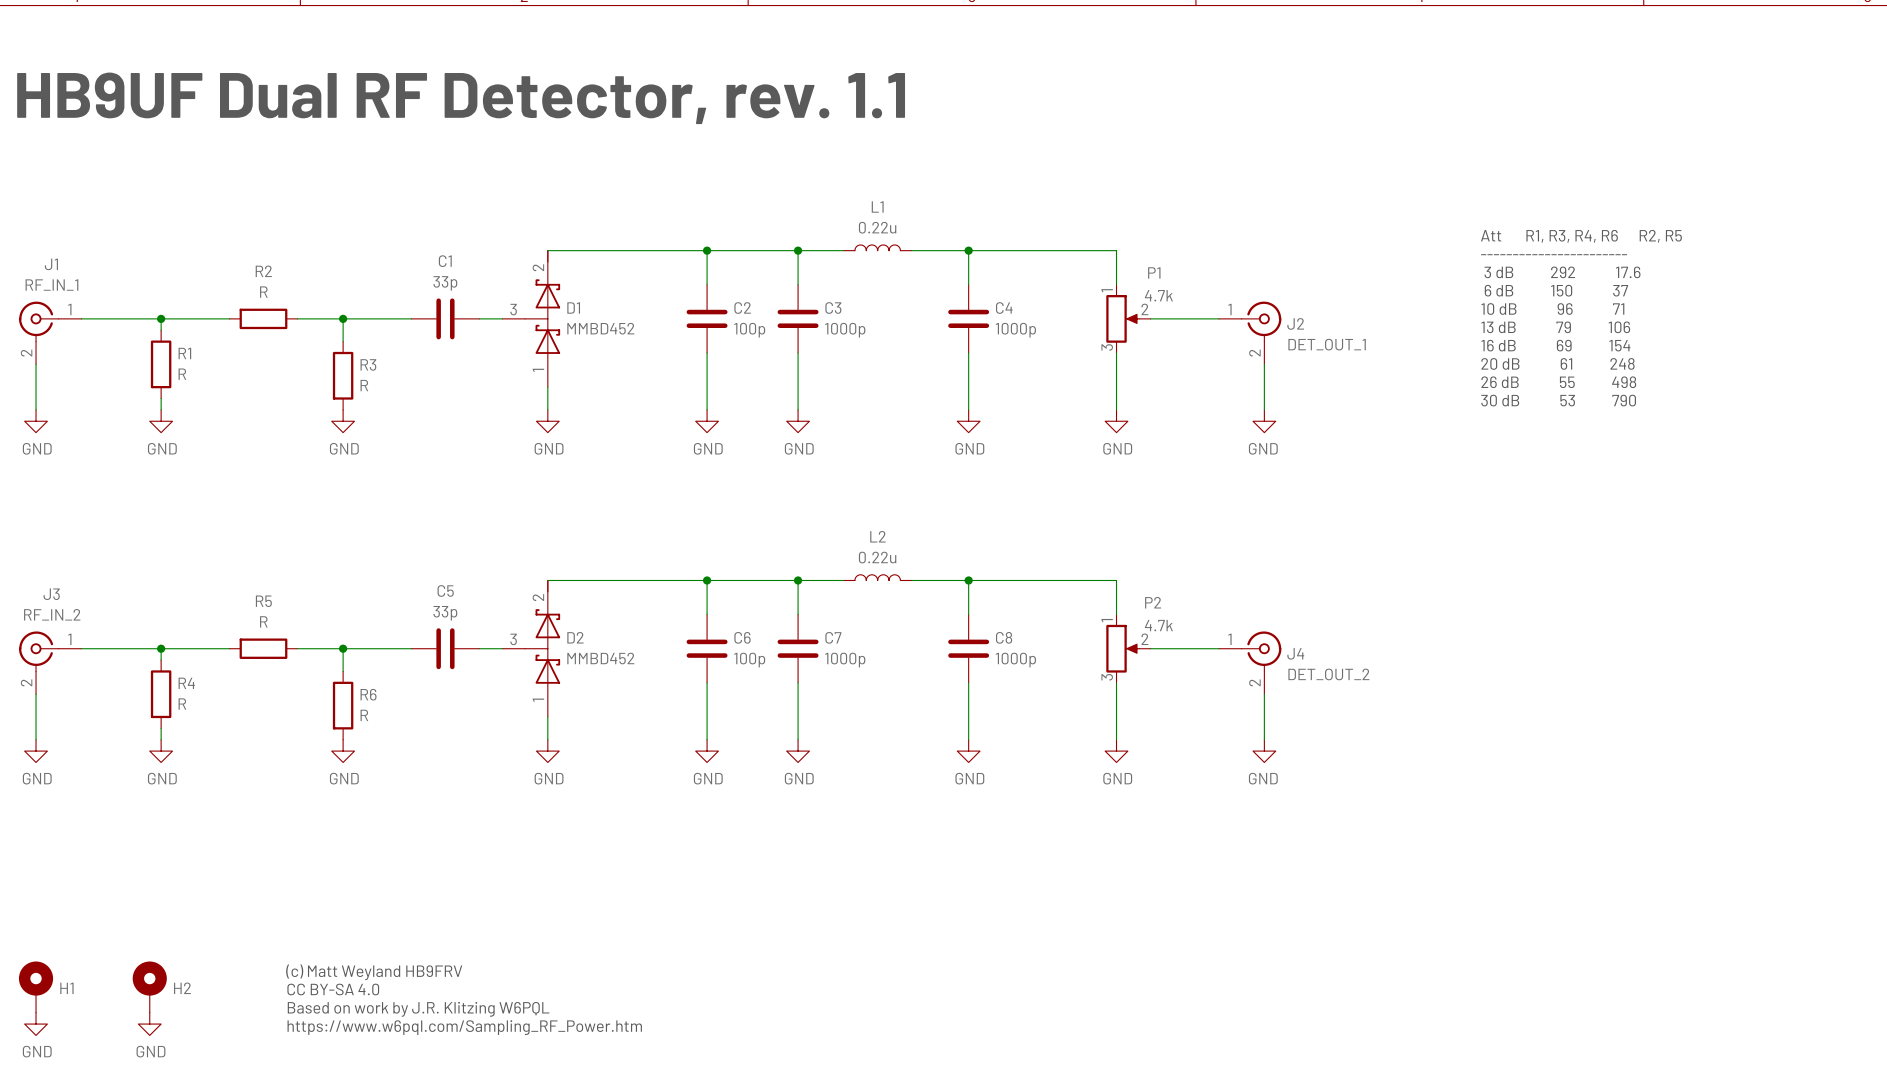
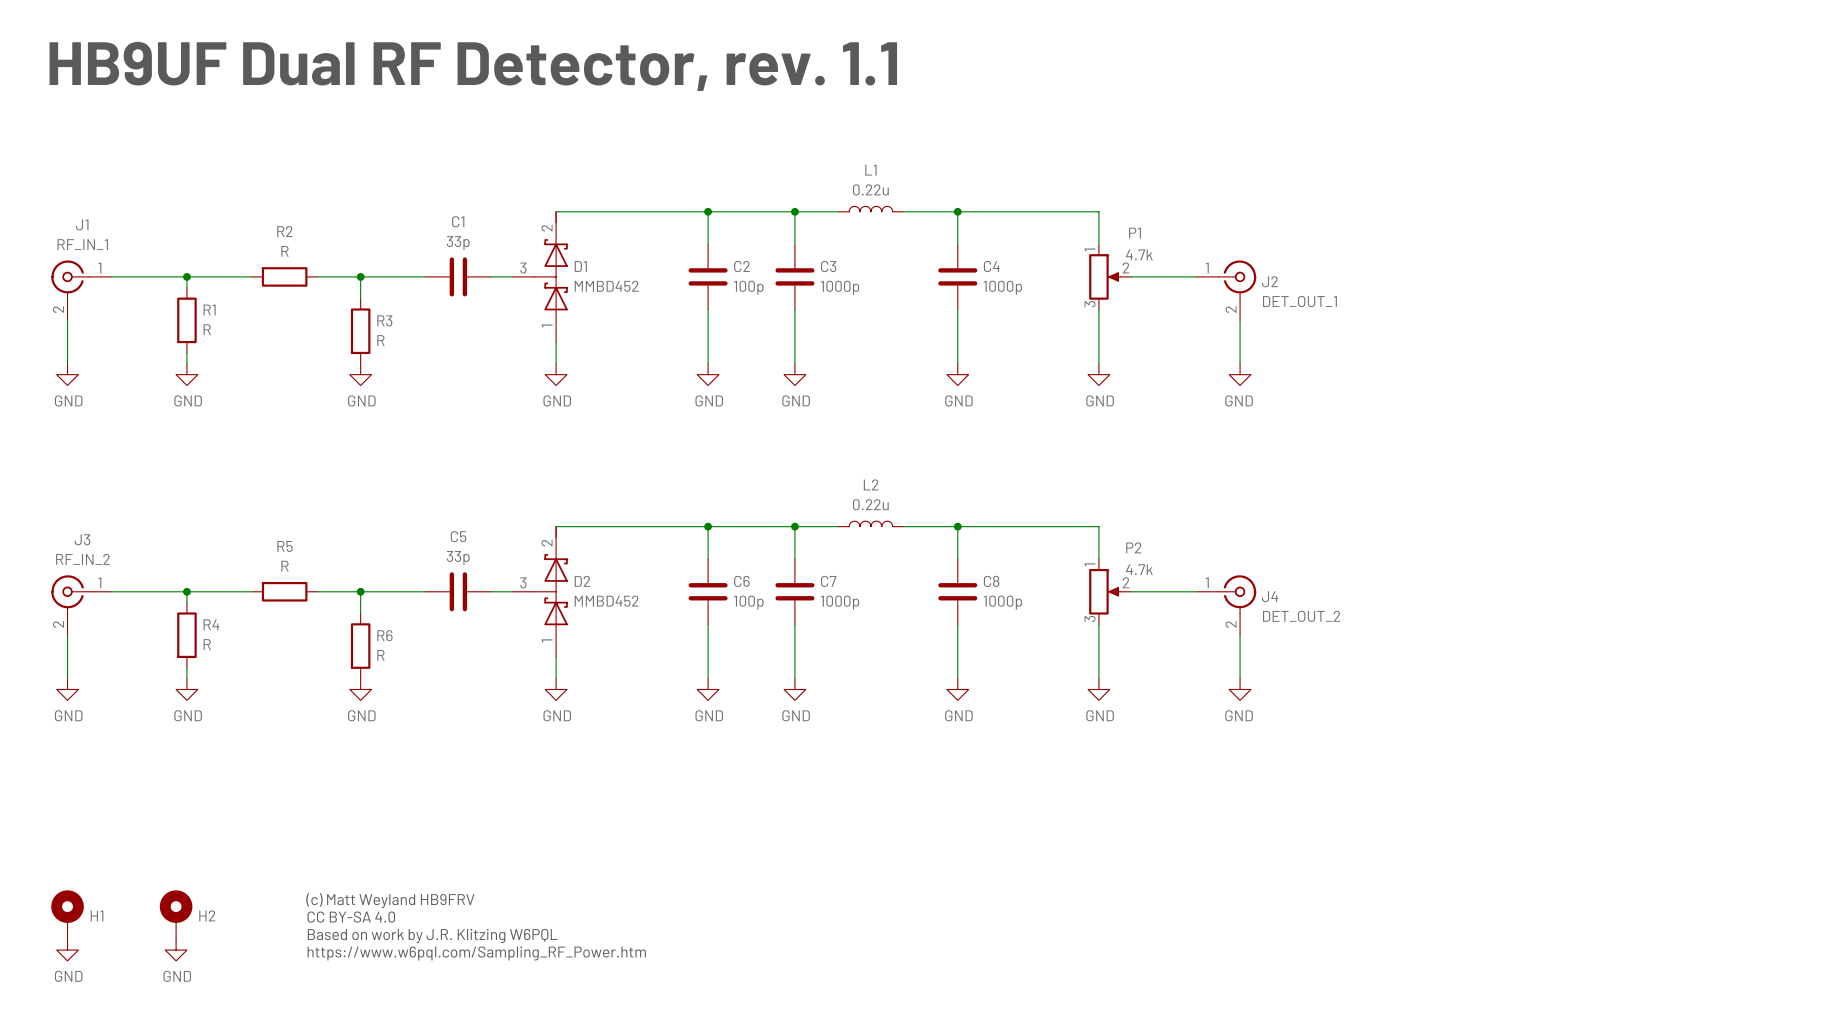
text: Att R1, R3, R4, R6 R2, R5 (1581, 236) -> none
text: ----------------------- (1554, 254) -> none
text: 3 dB 292 17.6 (1562, 272) -> none
text: 6 dB 150 37 (1556, 290) -> none
text: 10 dB 96 71 (1552, 309) -> none
text: 13 dB 79 106 (1555, 327) -> none
text: 16 dB 69 154 (1555, 345) -> none
text: 20 dB 61 248 (1557, 363) -> none
text: 26 dB 55 498 (1558, 382) -> none
text: 30 dB 53 790 (1558, 400) -> none

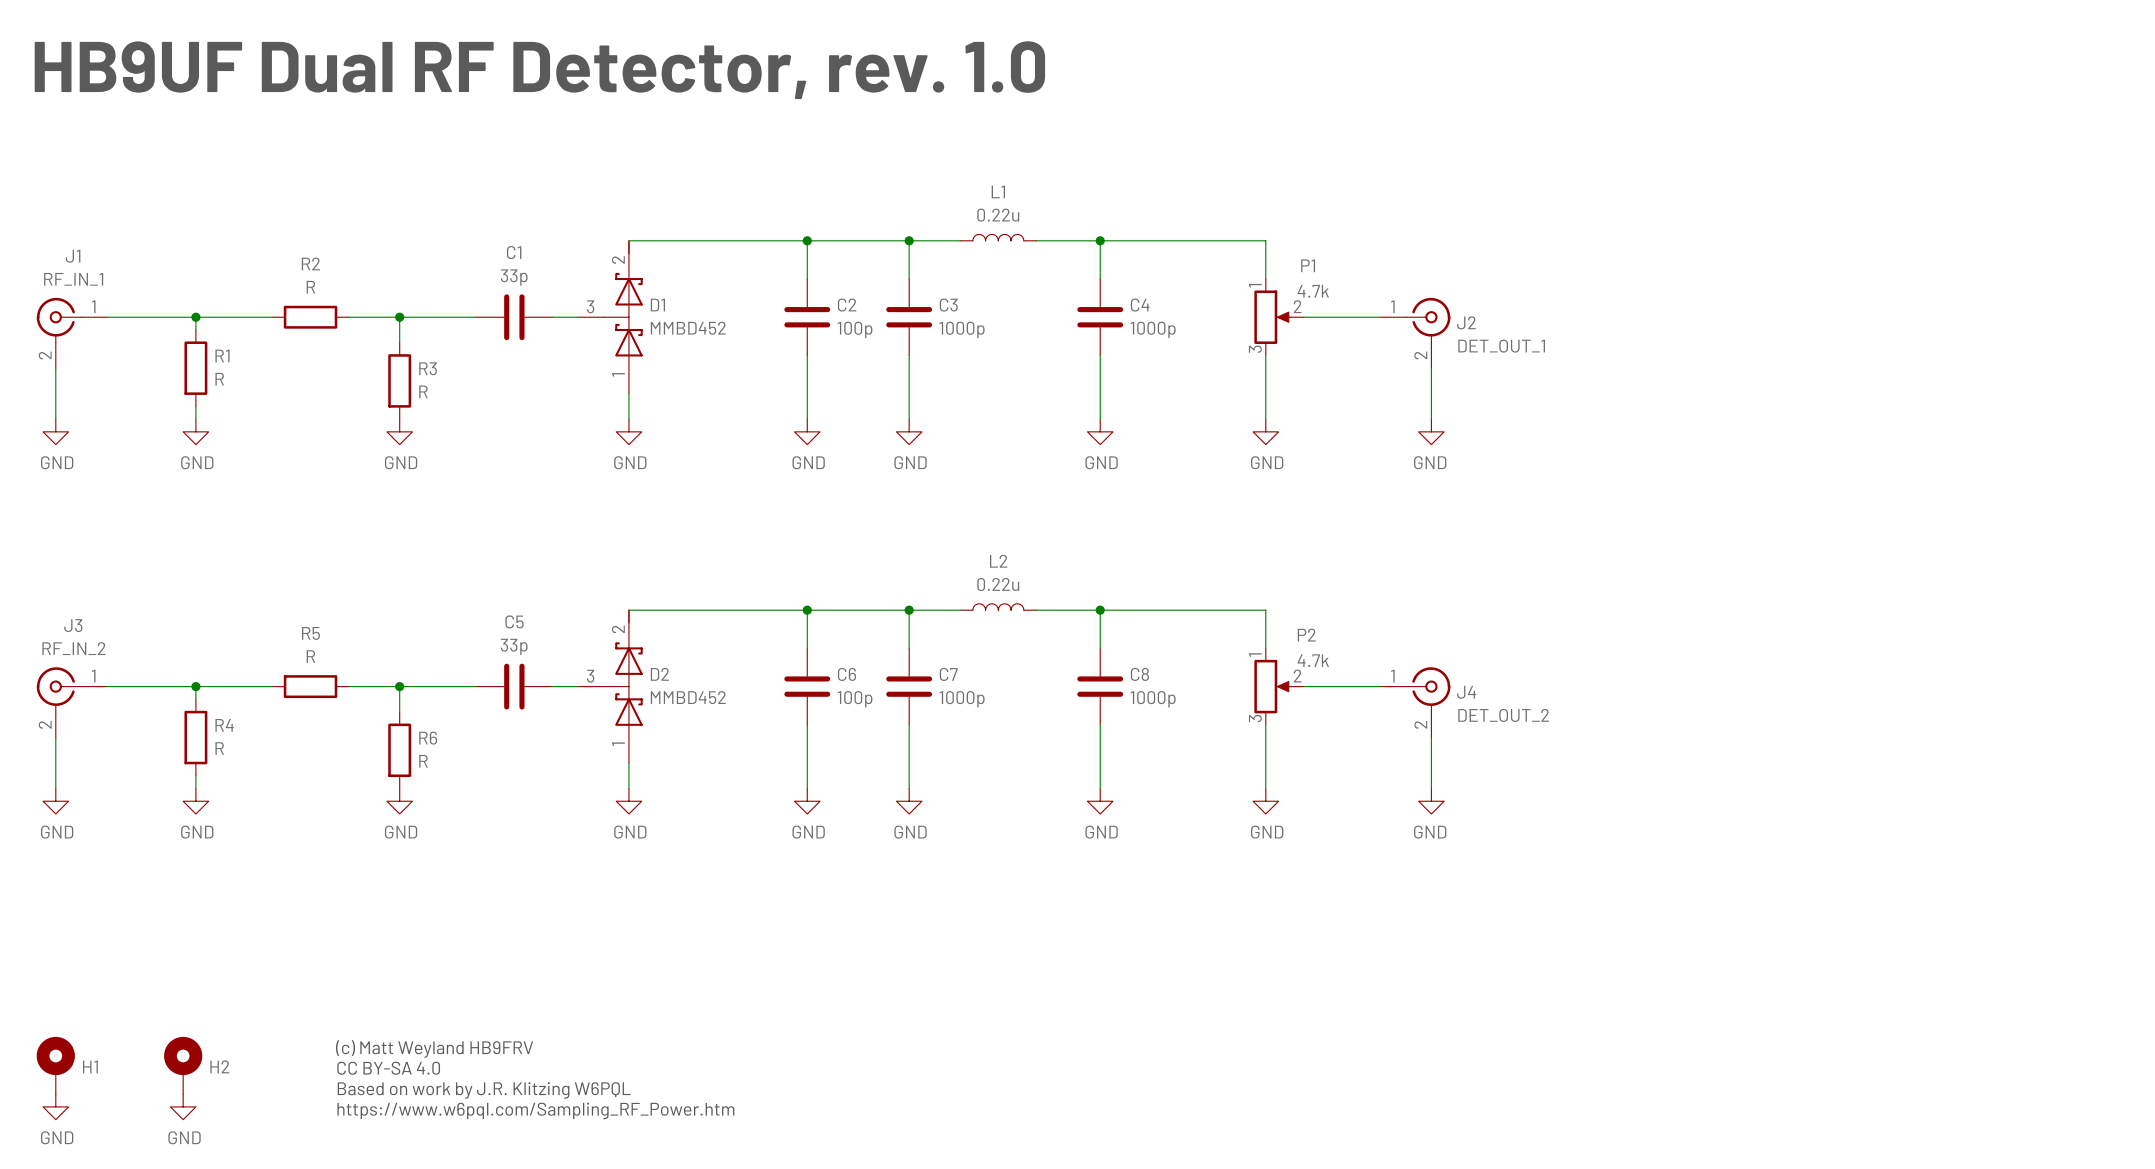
text: HB9UF Dual RF Detector, rev. 1.1 (473, 66) -> HB9UF Dual RF Detector, rev. 1.0 (539, 70)

